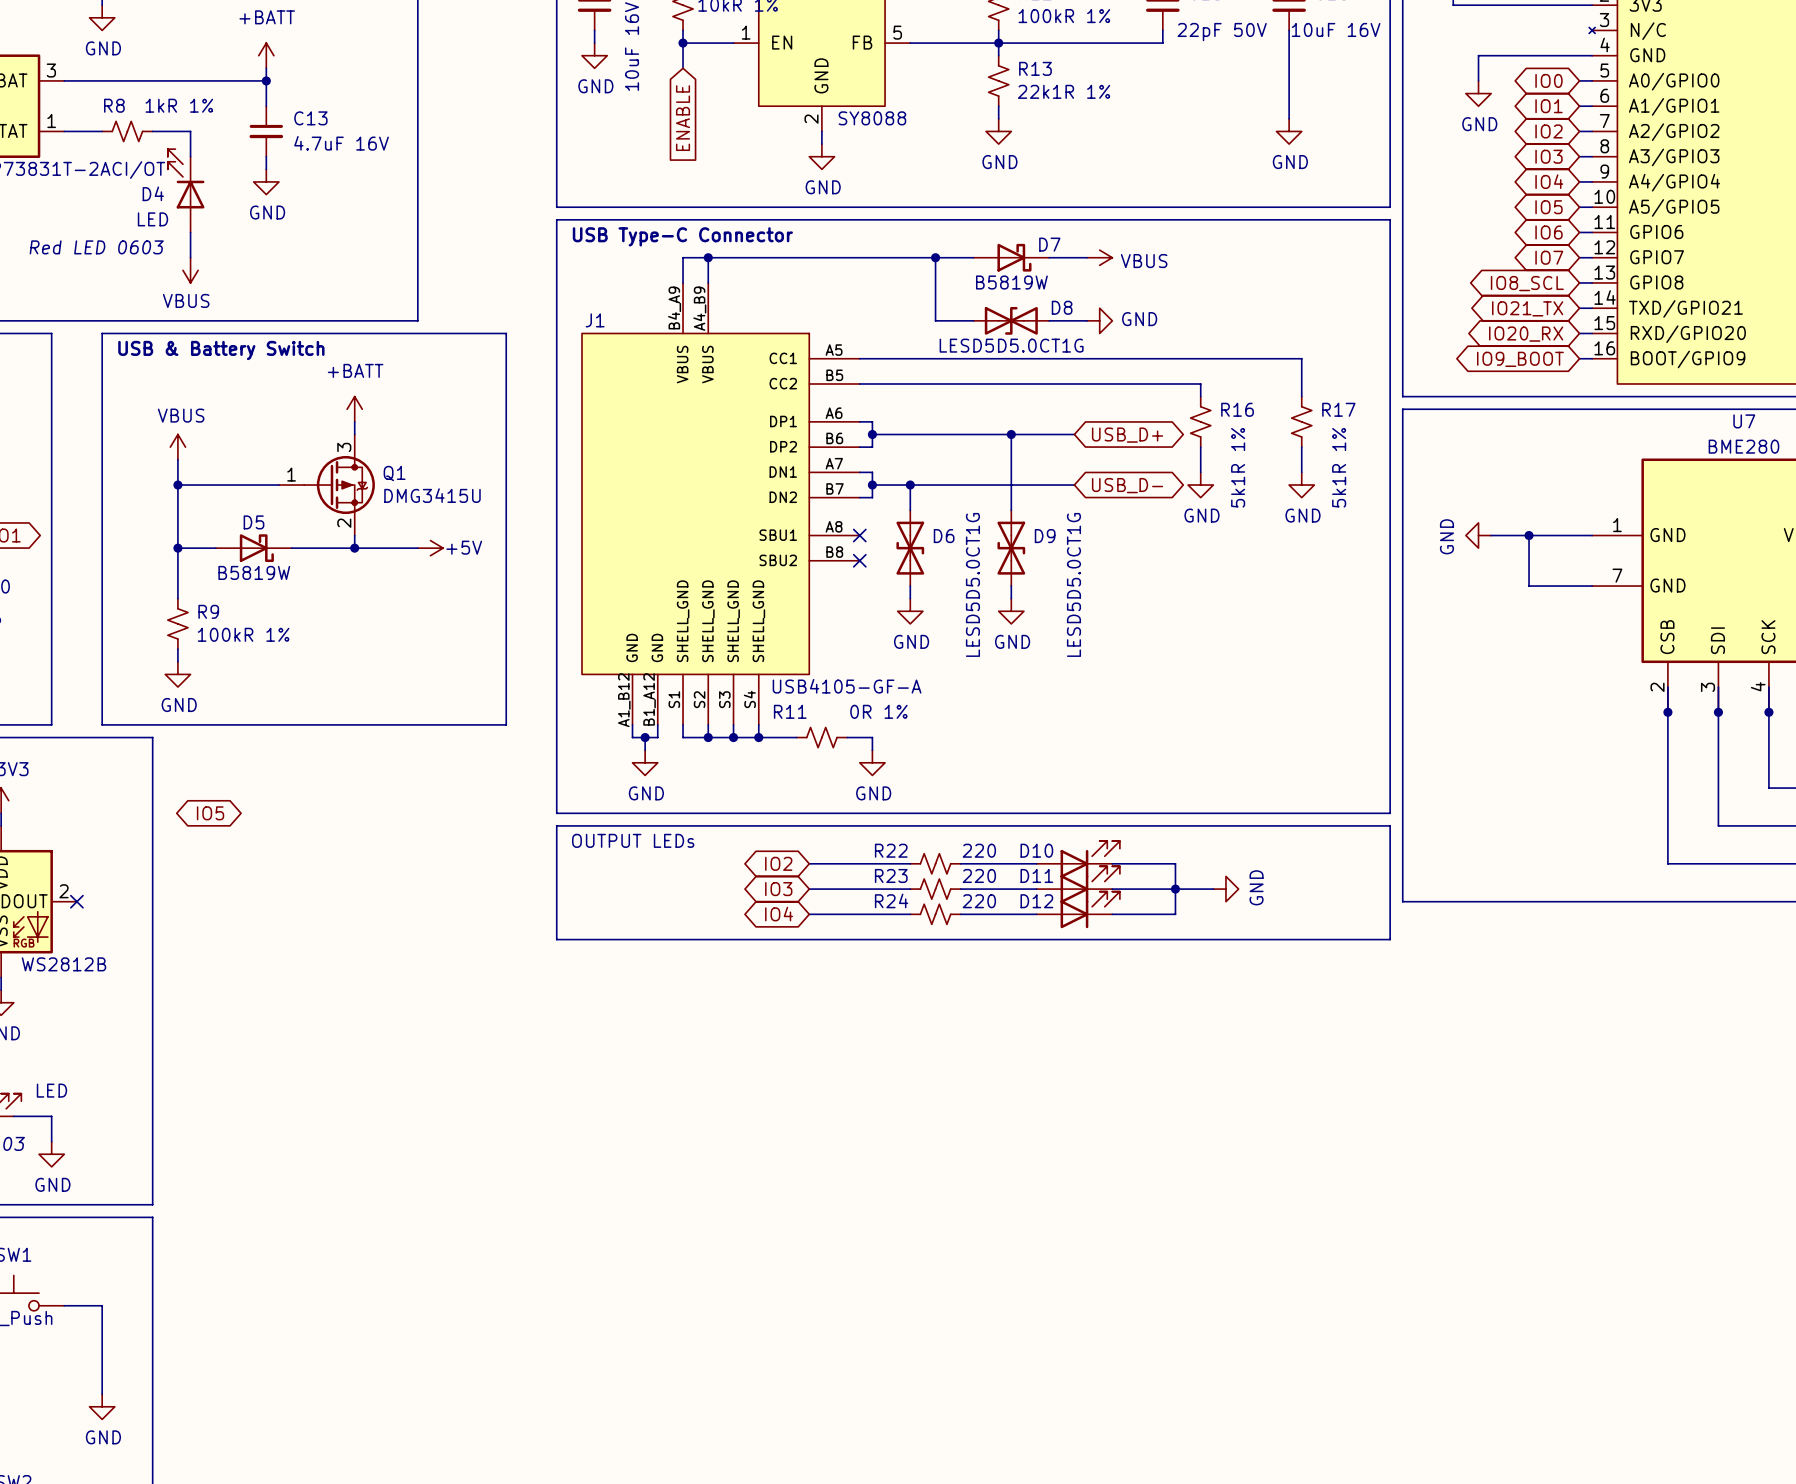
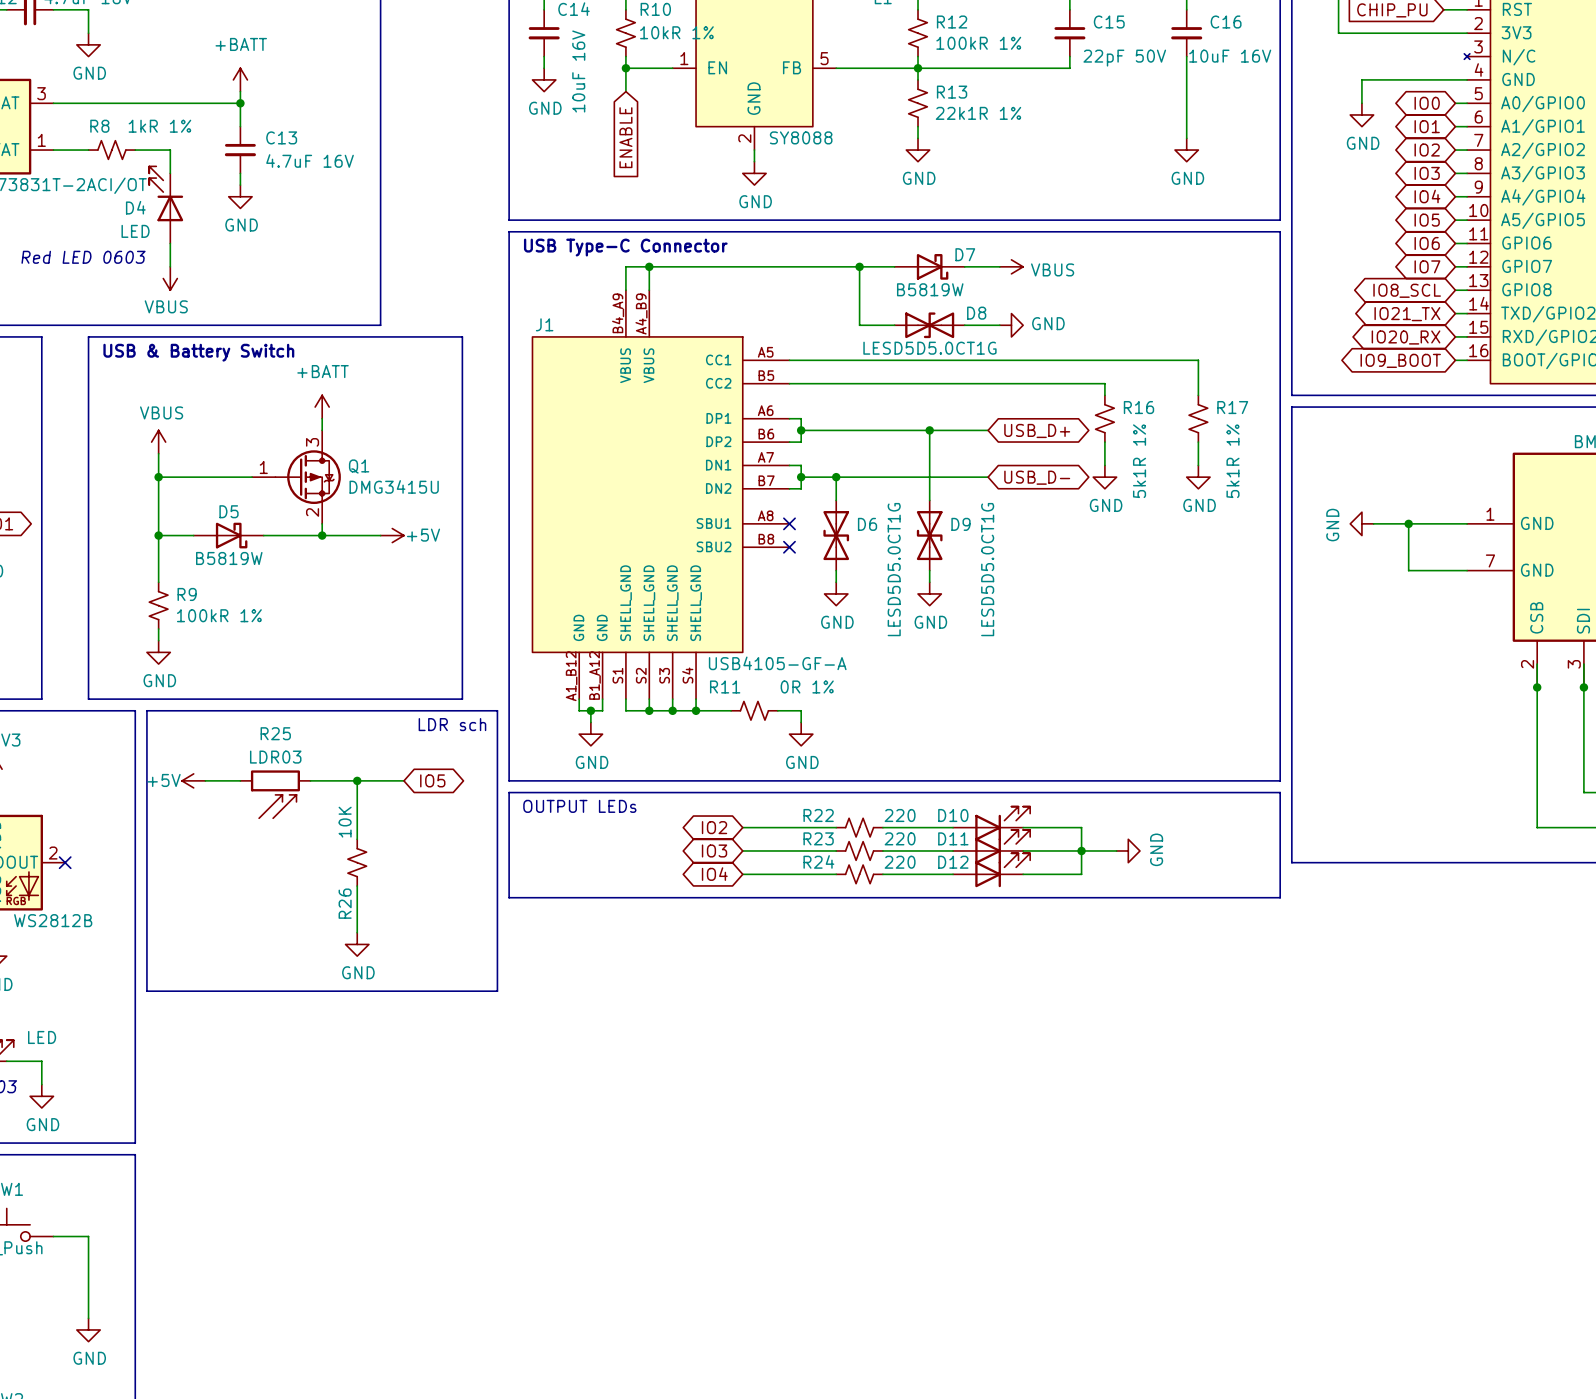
line: none -> (146, 710) (497, 710) (497, 991) (146, 991) (146, 710)
text: none -> LDR sch (452, 724)
global label rotation: 0° (210, 813) -> 180° (432, 780)
global label position: IO5 (210, 813) -> IO5 (432, 780)
power symbol: none -> +5V (193, 780)
wire: none -> (205, 780) (240, 780)
wire: none -> (310, 780) (403, 780)
wire: none -> (357, 780) (357, 839)
junction: none -> (357, 780)
R25: none -> LDR03 (275, 794)
R26: none -> 10K (357, 862)
wire: none -> (357, 886) (357, 932)
power symbol: none -> GND (357, 944)

